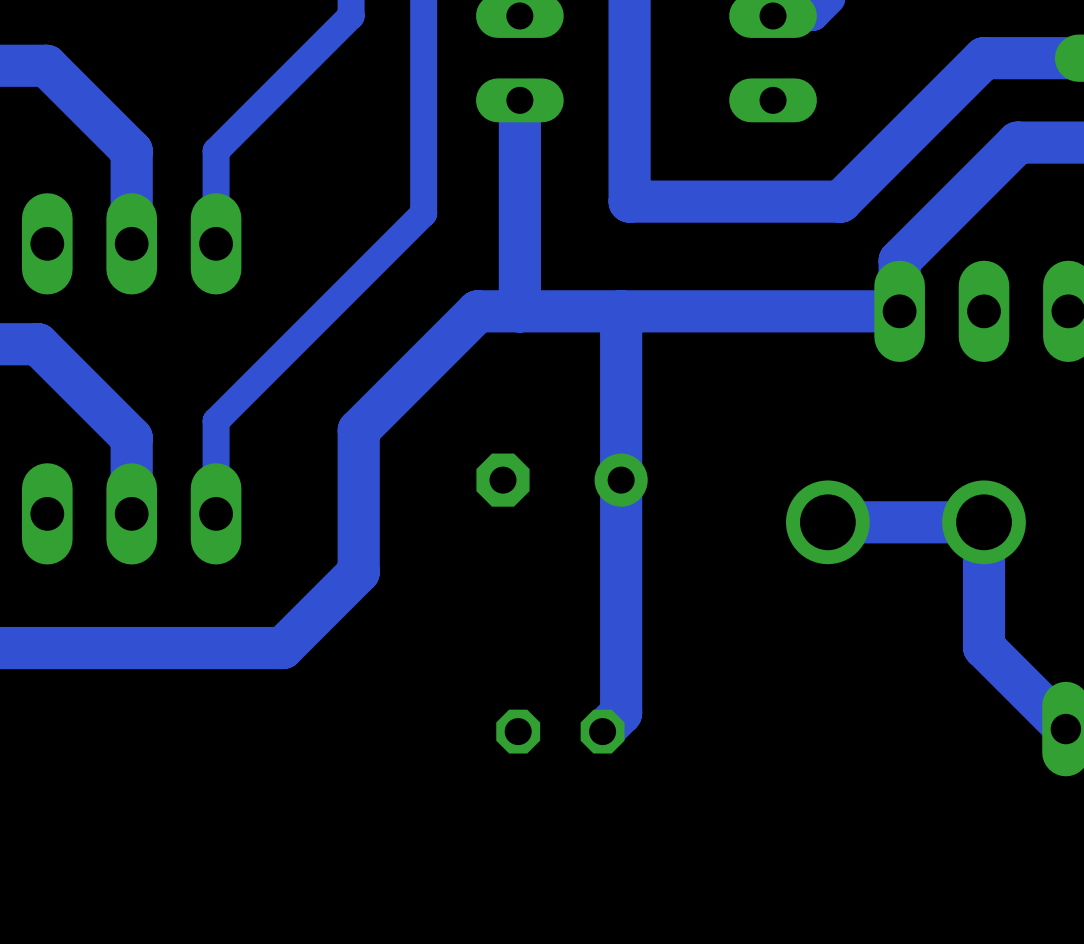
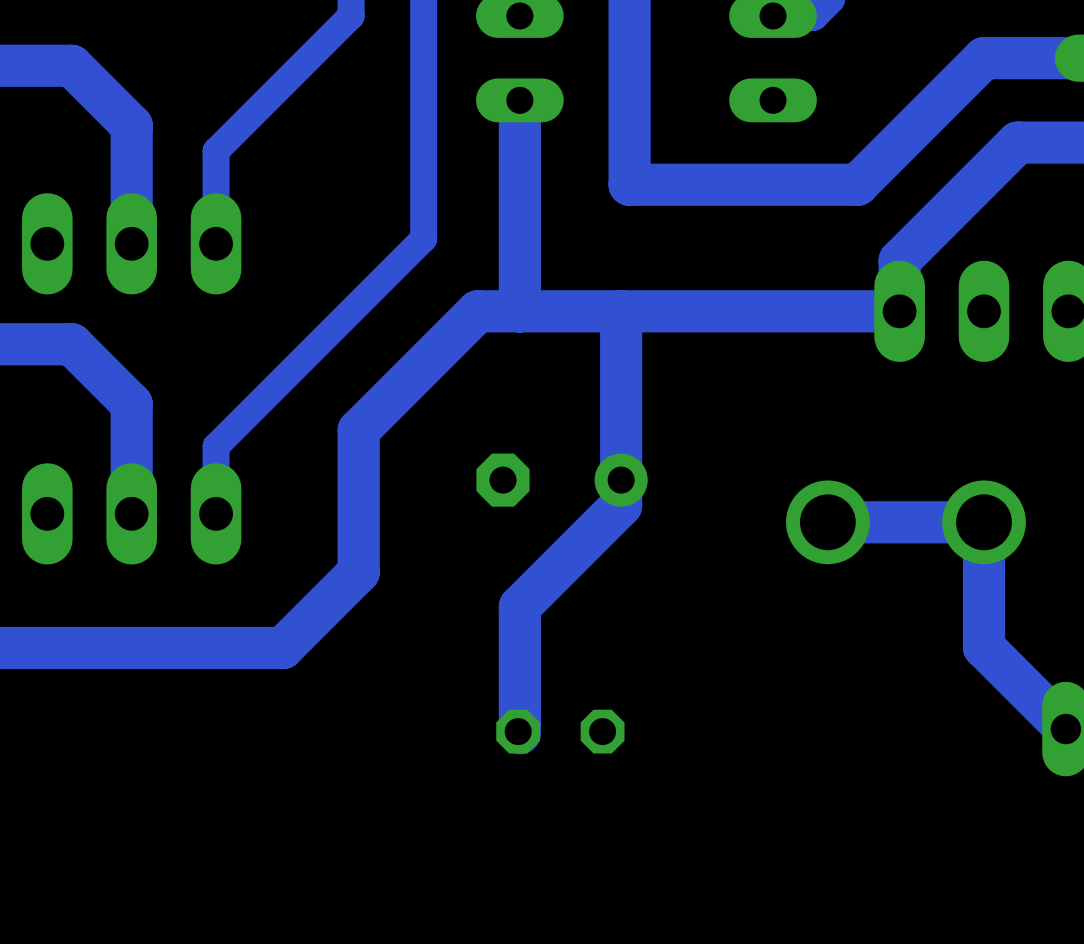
track: (46, 65) (131, 151) -> (46, 65) (71, 65) (131, 125) (131, 151)
track: (857, 184) (840, 201) (629, 201) (629, 184) -> (857, 184) (629, 184)
track: (423, 213) (216, 421) (216, 446) -> (423, 213) (423, 238) (216, 446)
track: (38, 344) (131, 437) -> (38, 344) (71, 344) (131, 404) (131, 437)
track: (621, 505) (621, 713) (602, 731) -> (621, 505) (519, 606) (519, 733)

